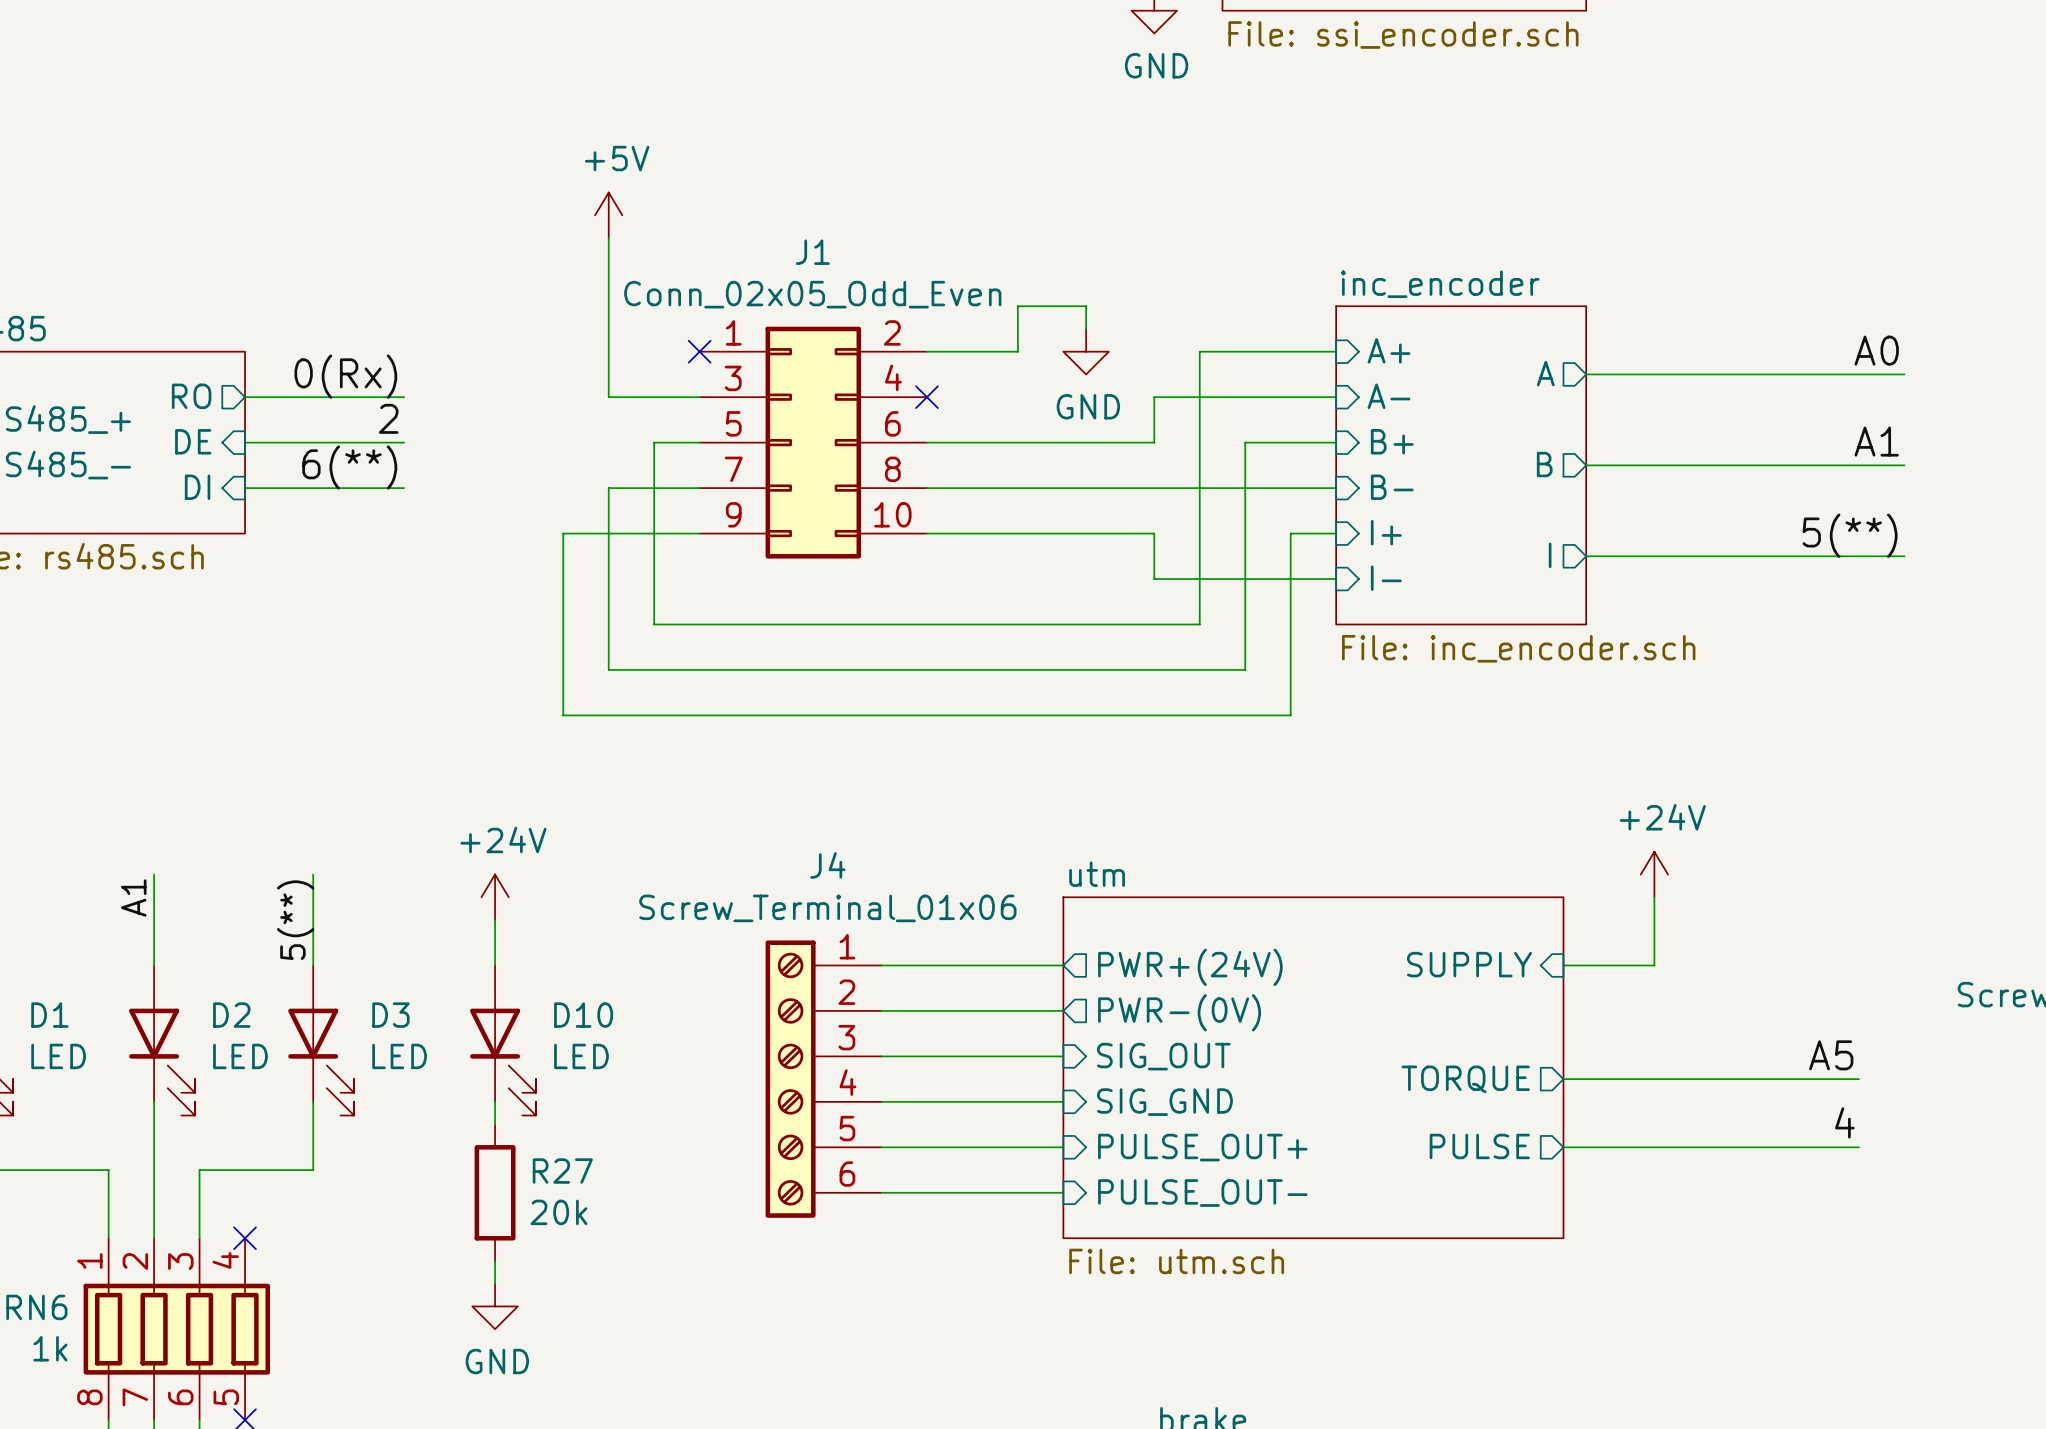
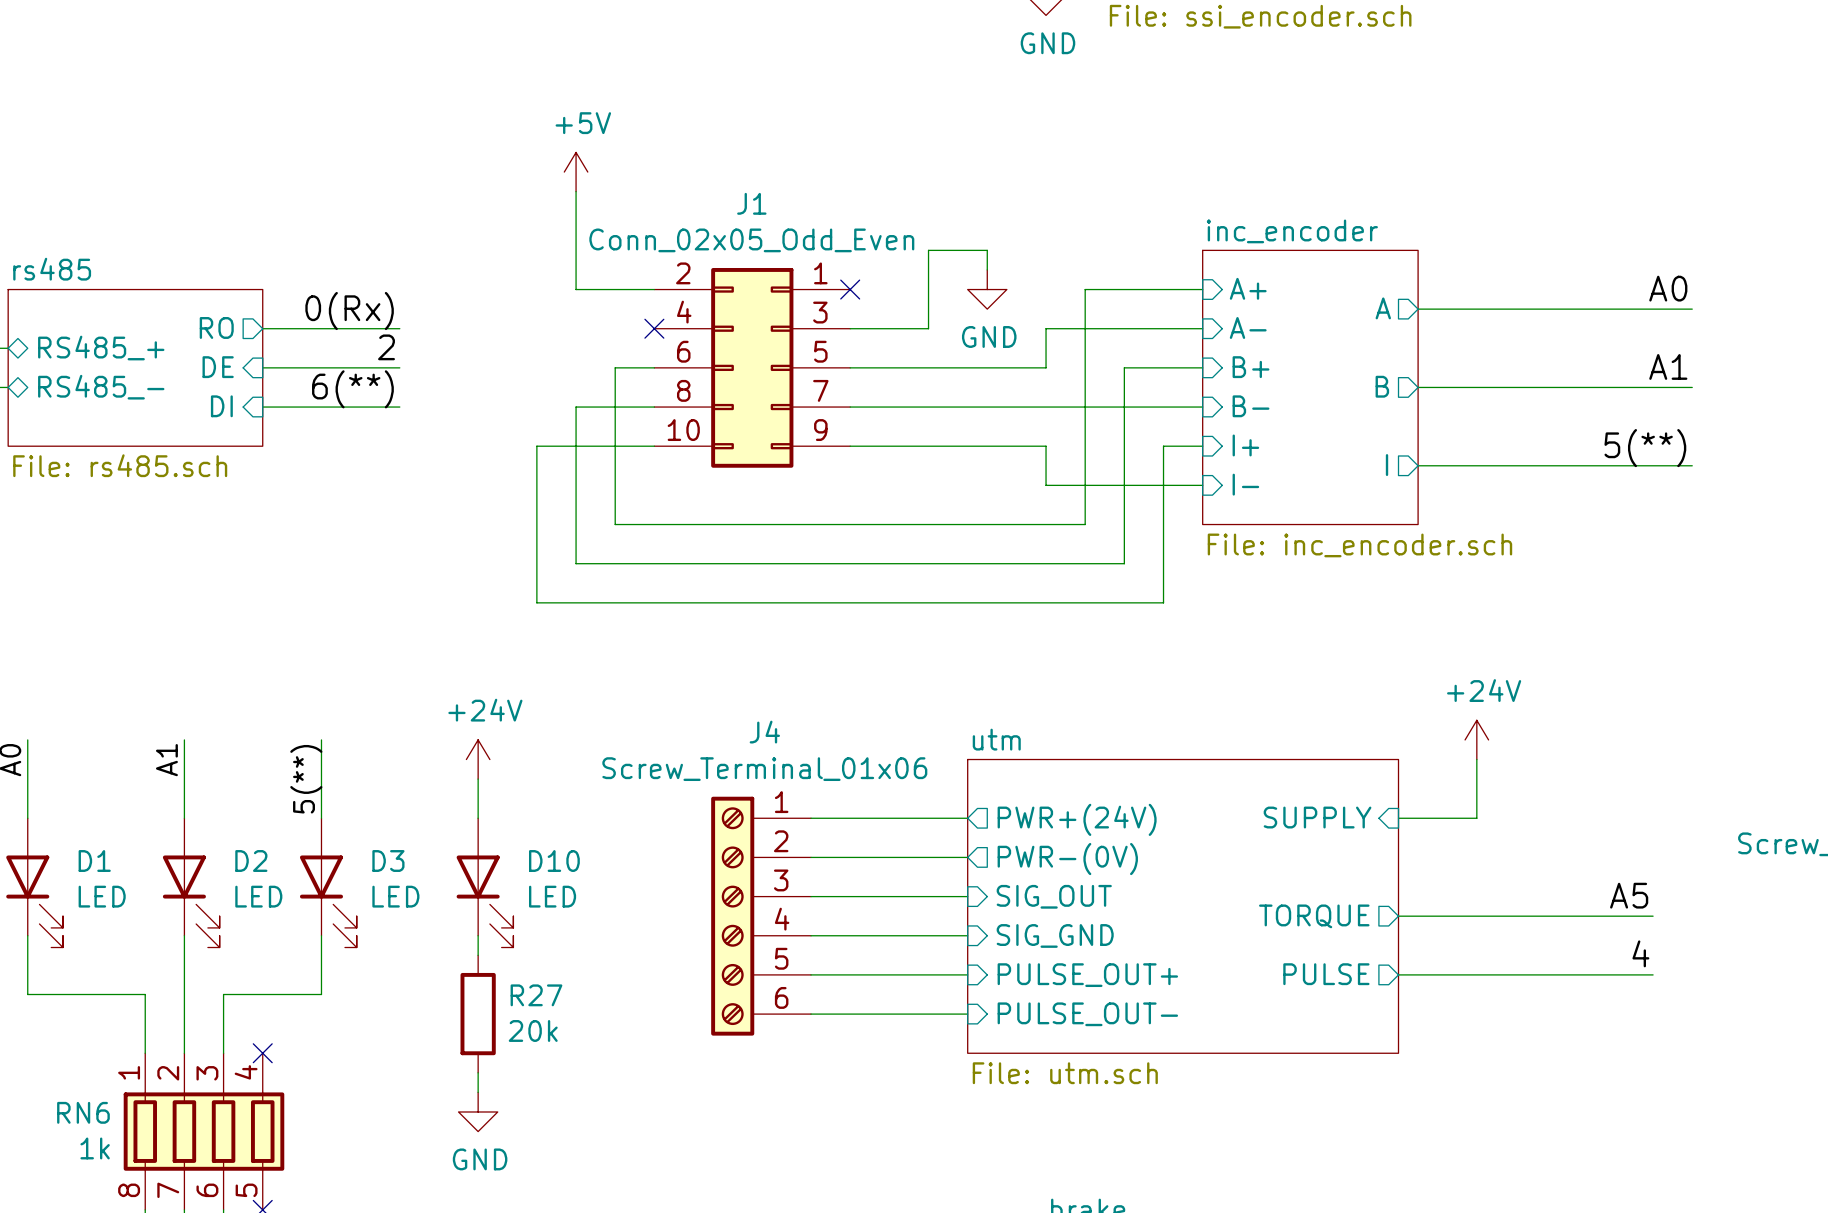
wire: (608, 351) (608, 397) (699, 397) -> (576, 289) (654, 289)
no-connect mark position: (699, 351) -> (654, 328)
wire: (926, 351) (1017, 351) -> (850, 328) (928, 328) (928, 289)
no-connect mark position: (926, 397) -> (850, 289)
J1 flip: as is (813, 442) -> left-right (752, 367)

